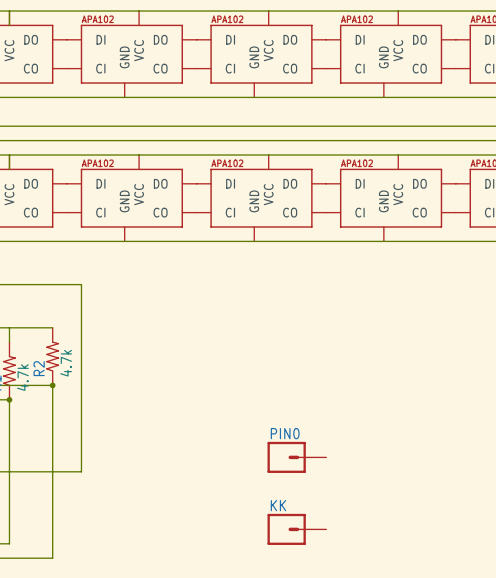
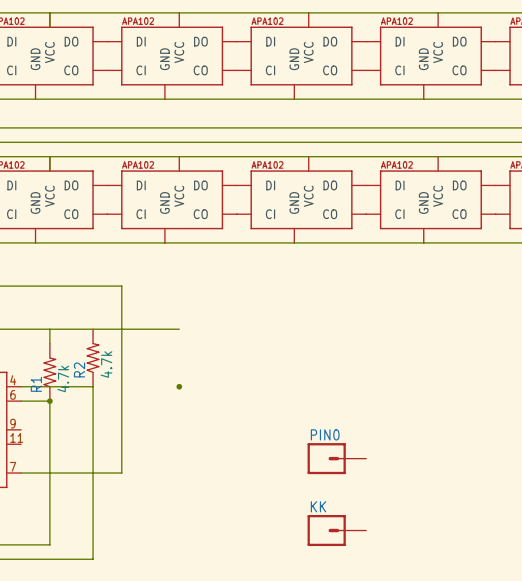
wire: none -> (93, 329) (179, 329)
junction: (52, 385) -> none
junction: none -> (179, 386)

